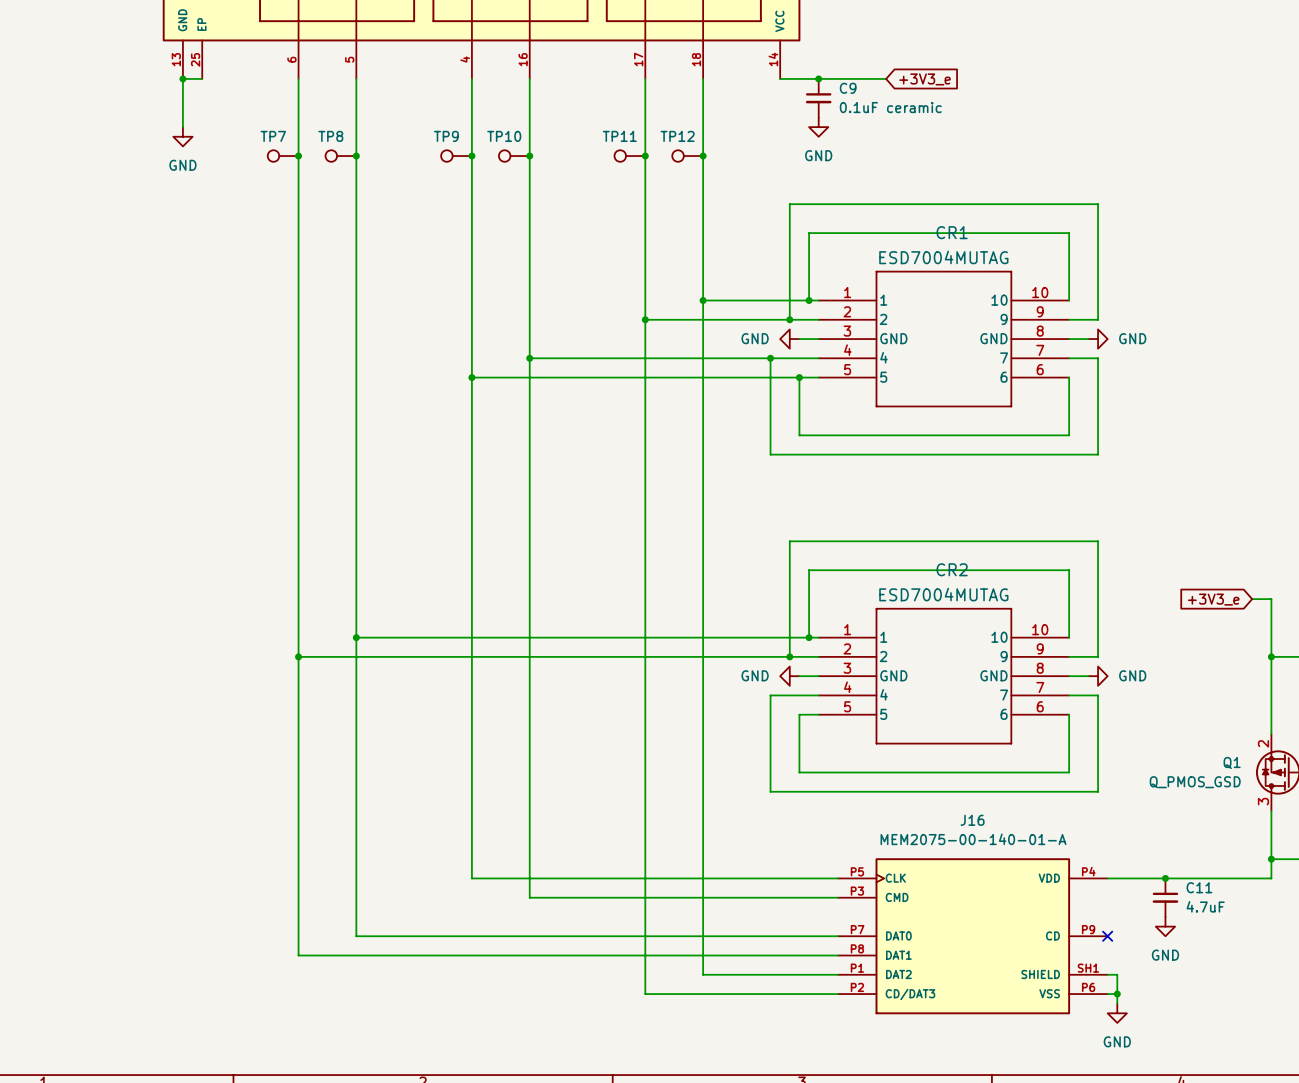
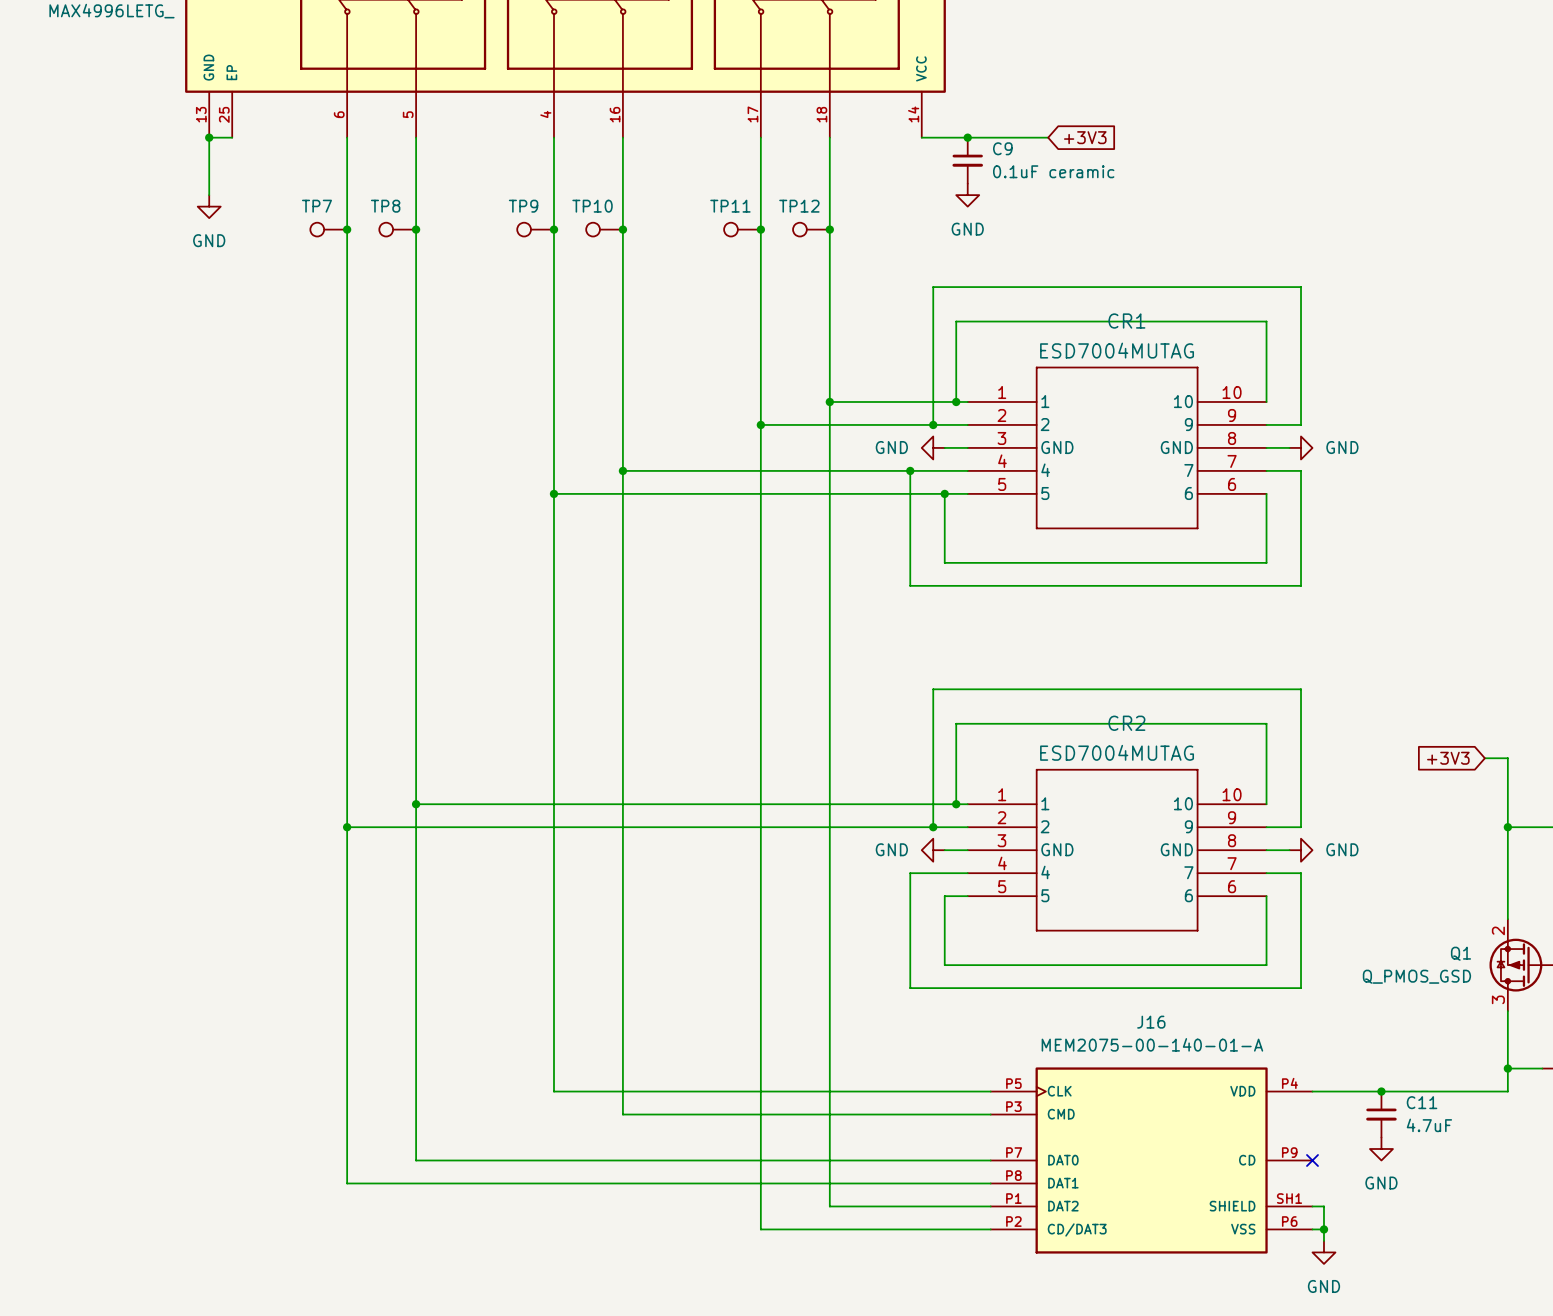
global label: +3V3_e (925, 79) -> +3V3 (1085, 137)
global label: +3V3_e (1213, 599) -> +3V3 (1448, 758)

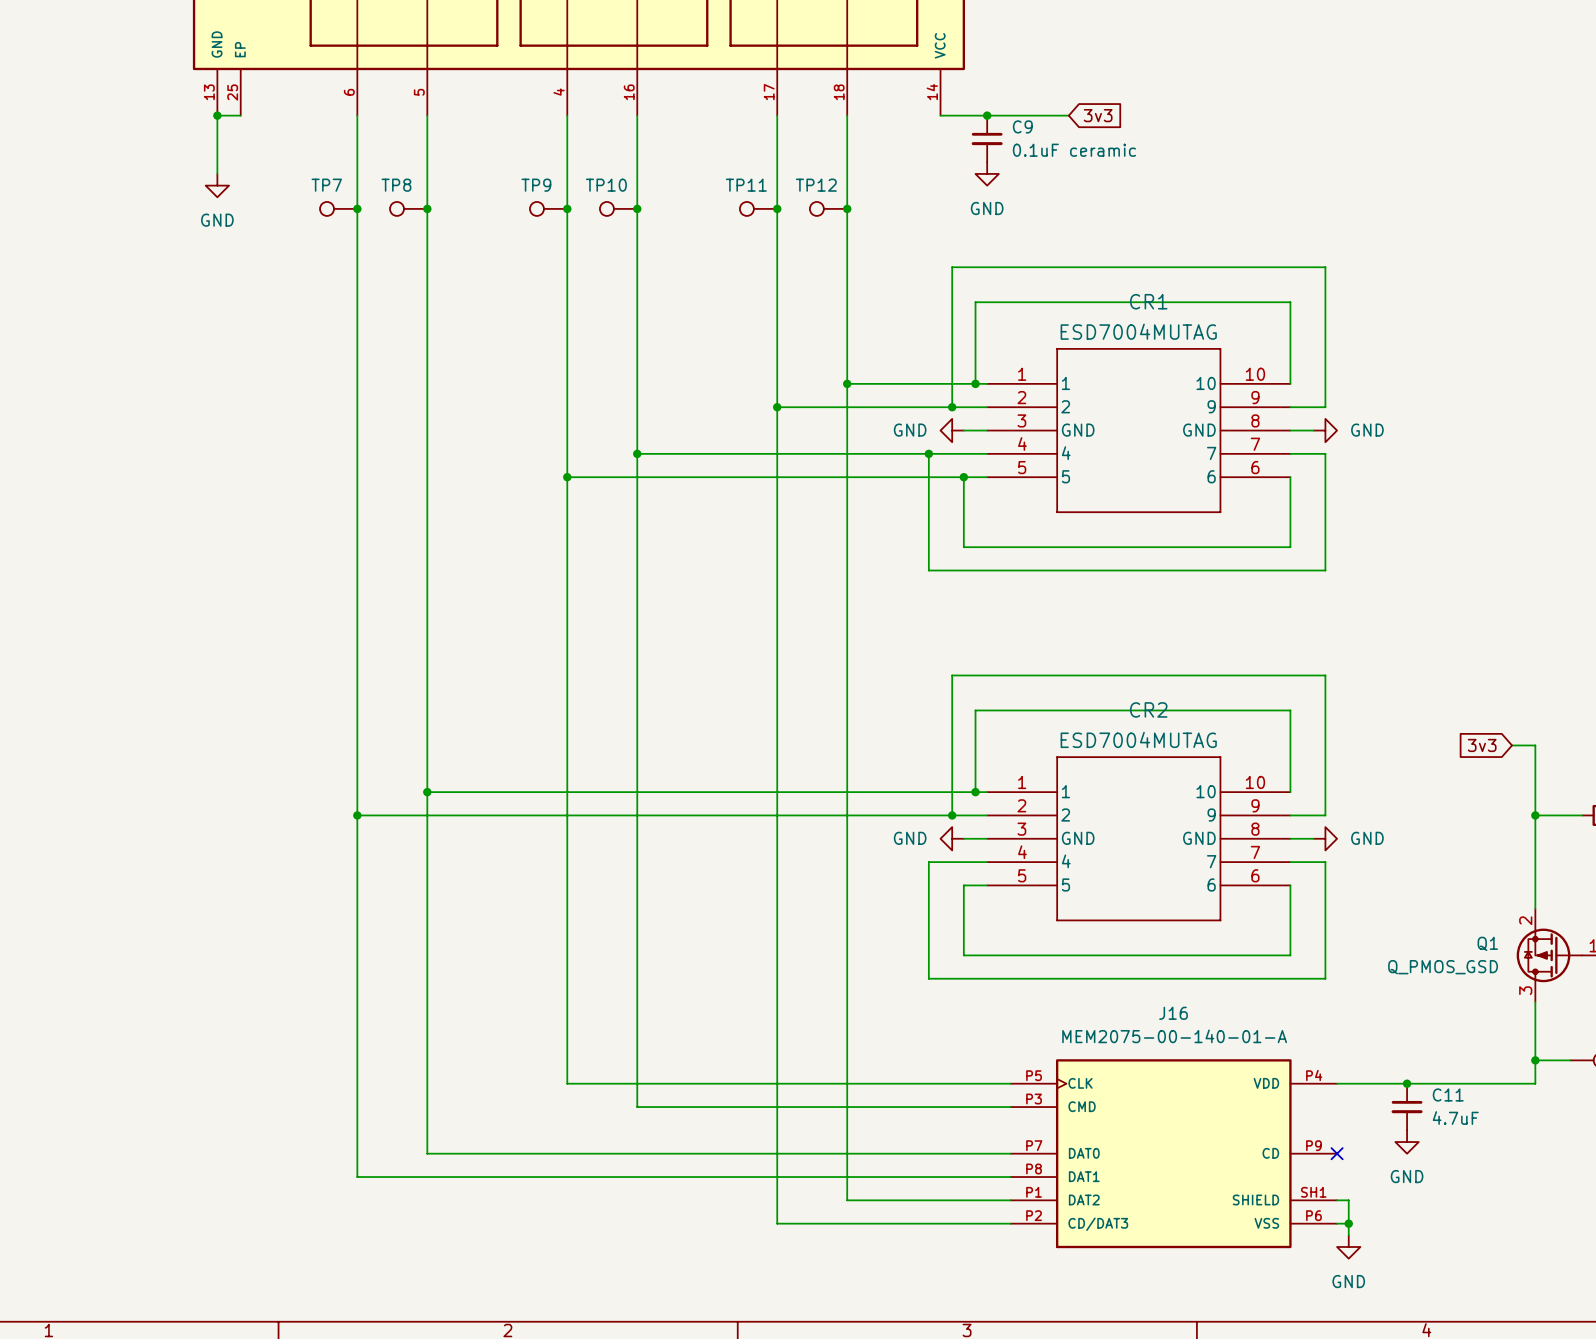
global label: +3V3 (1085, 137) -> 3v3 (1098, 115)
global label: +3V3 (1448, 758) -> 3v3 (1482, 745)

